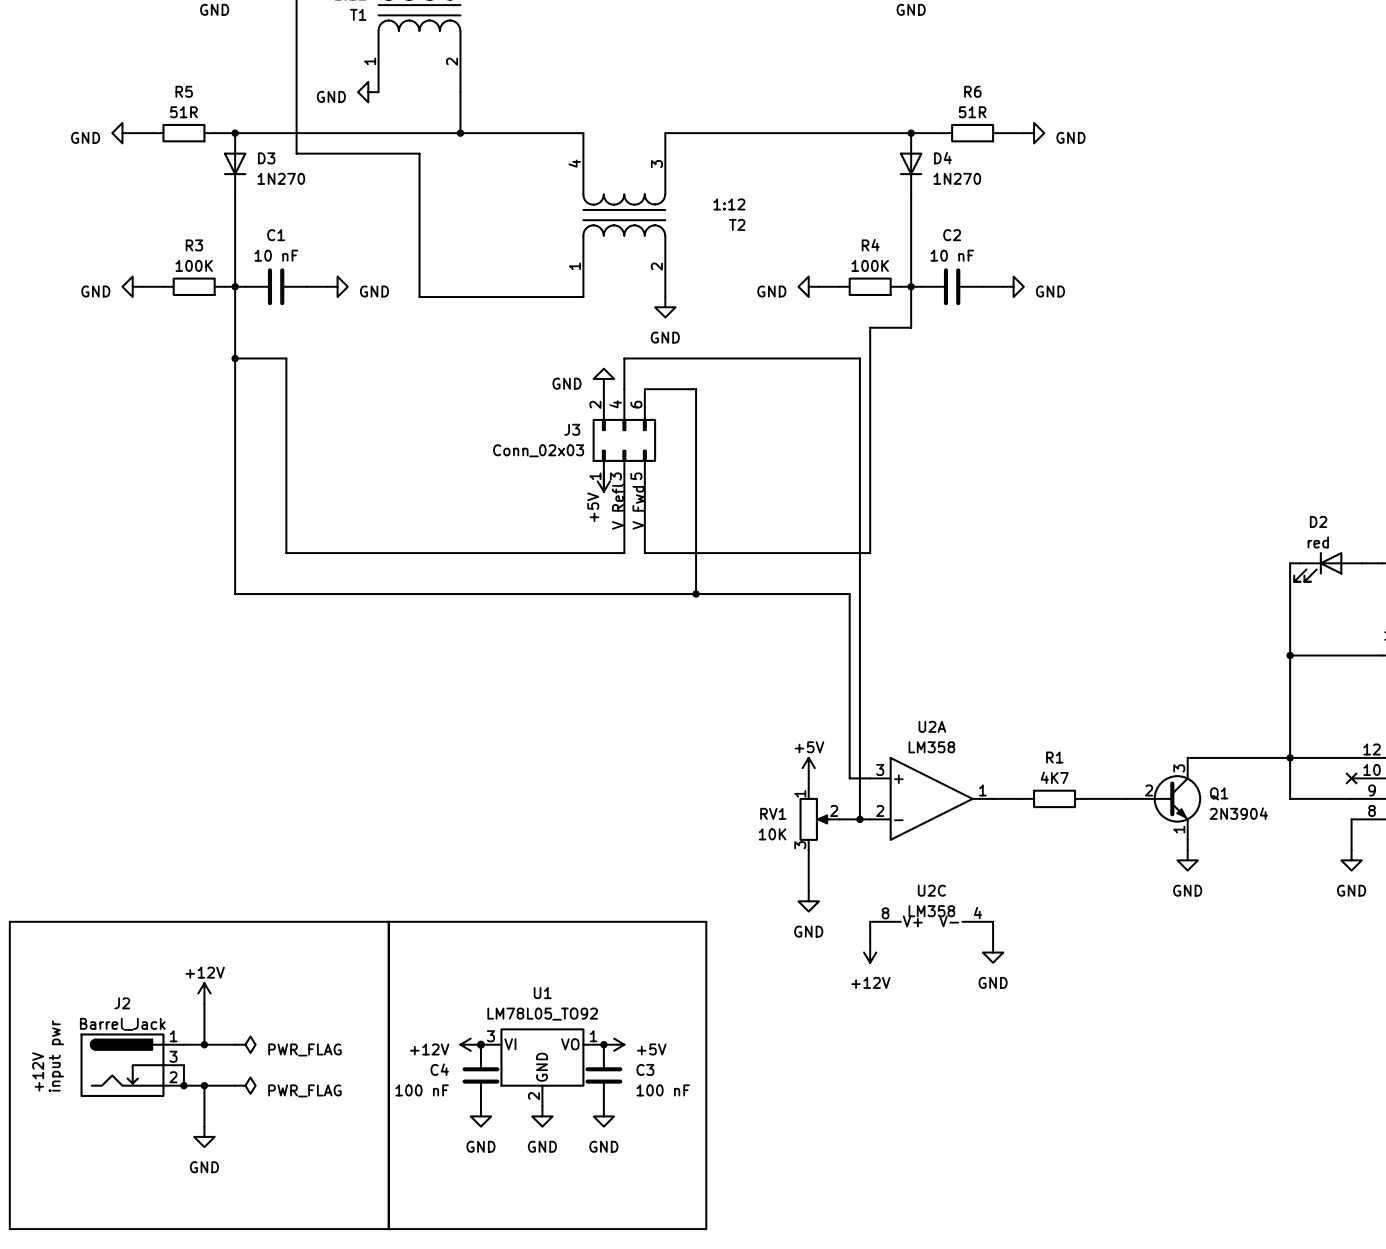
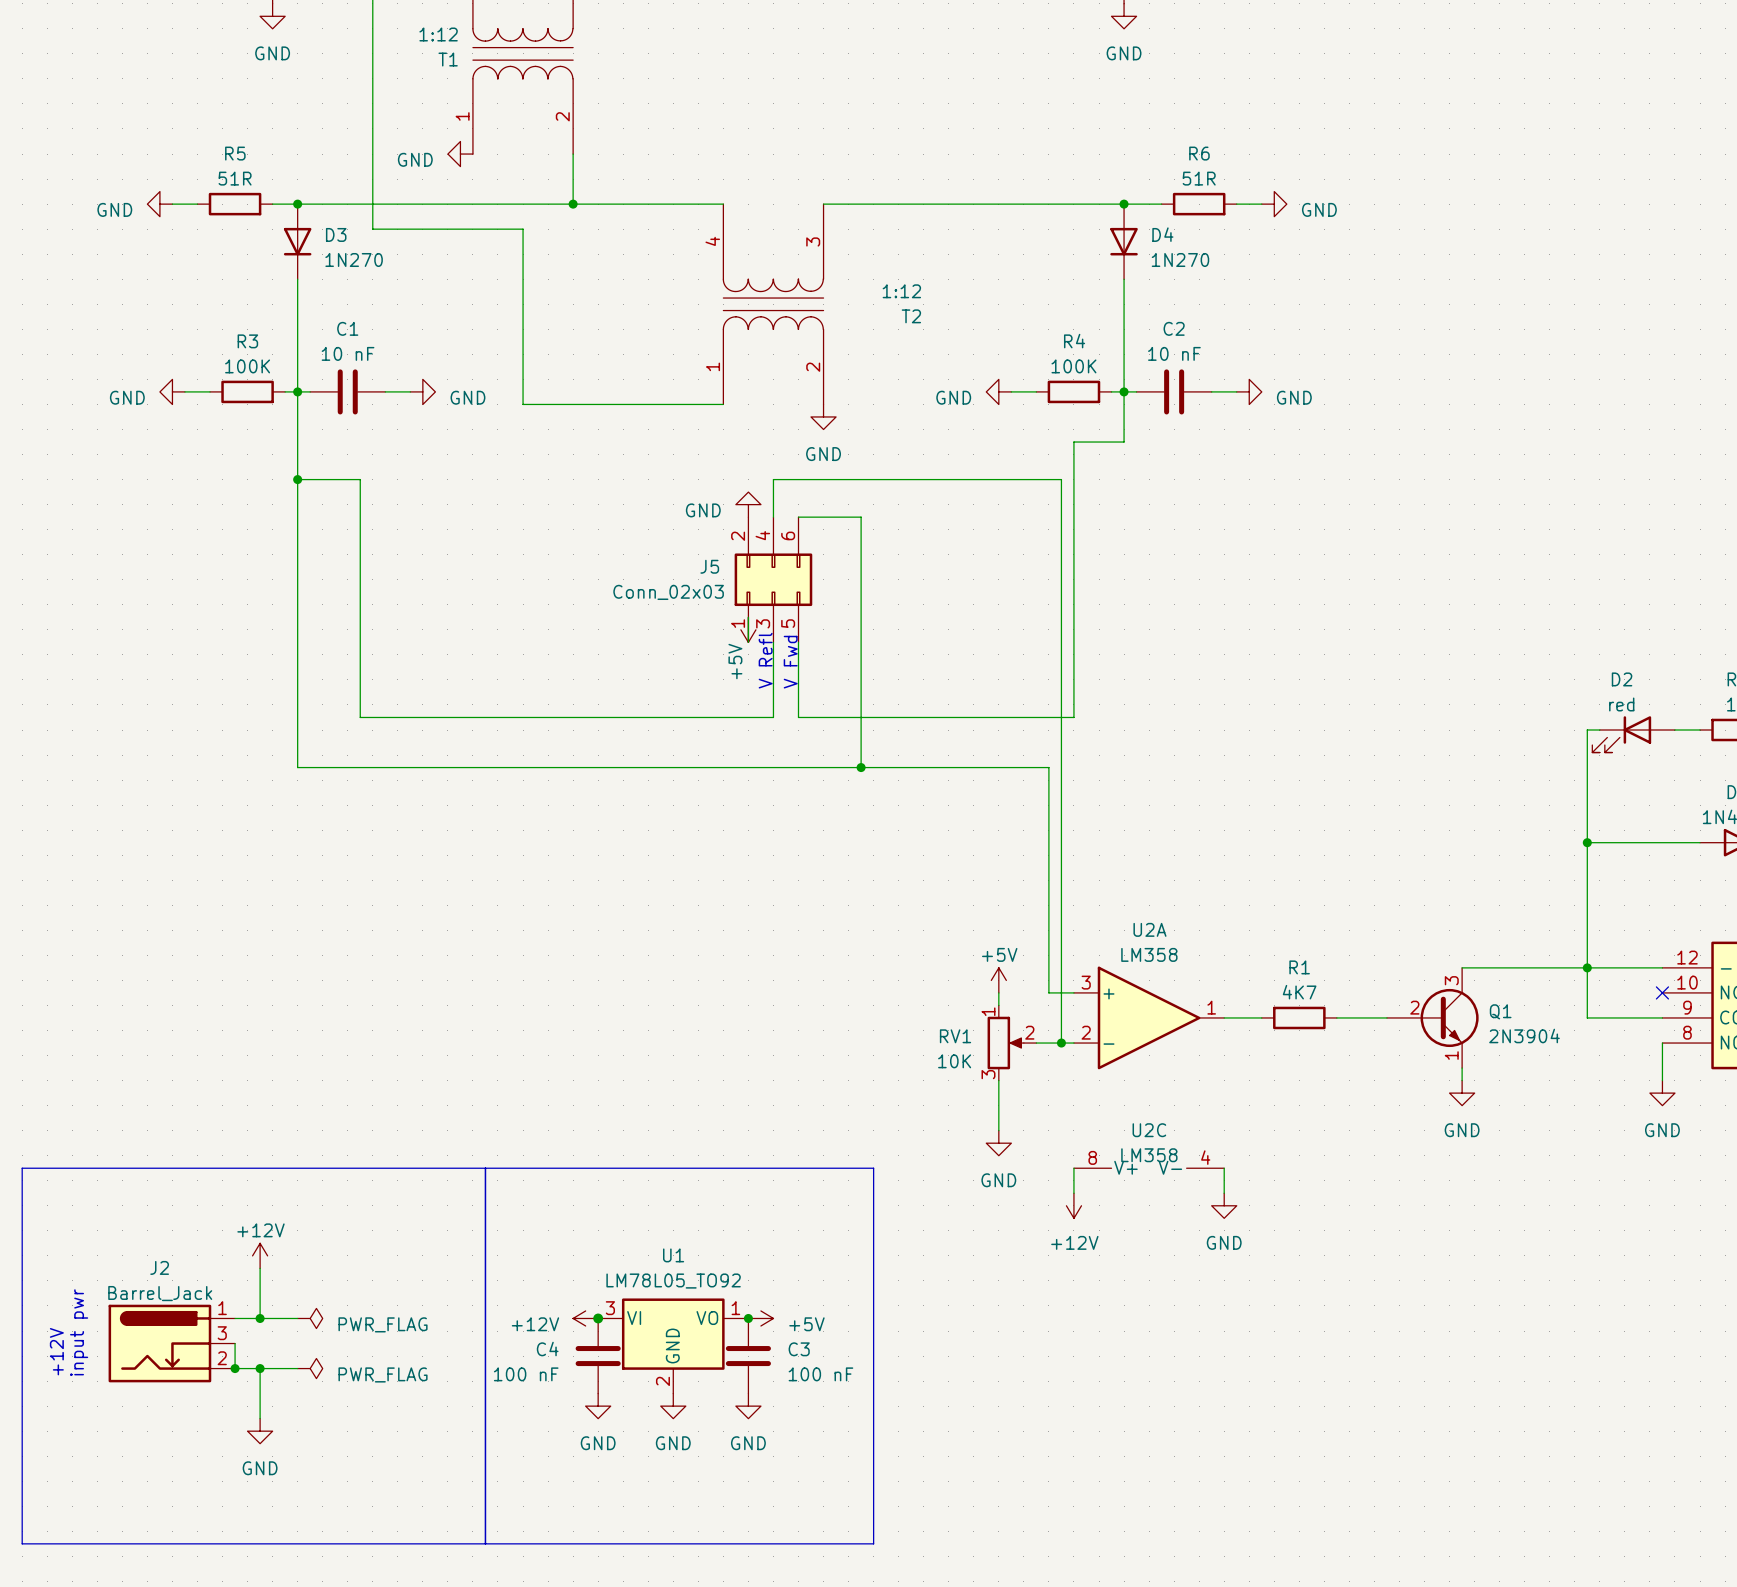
J3 name: J3 (572, 429) -> J5 (709, 566)

